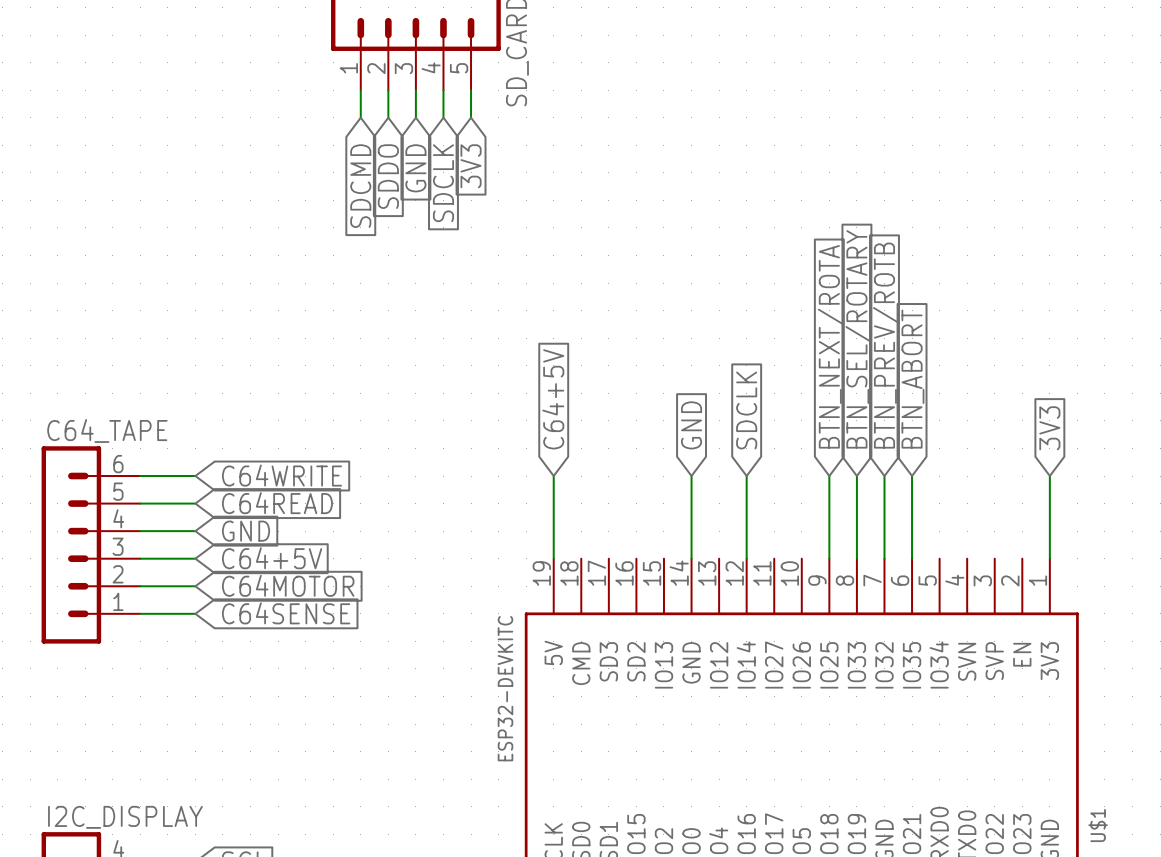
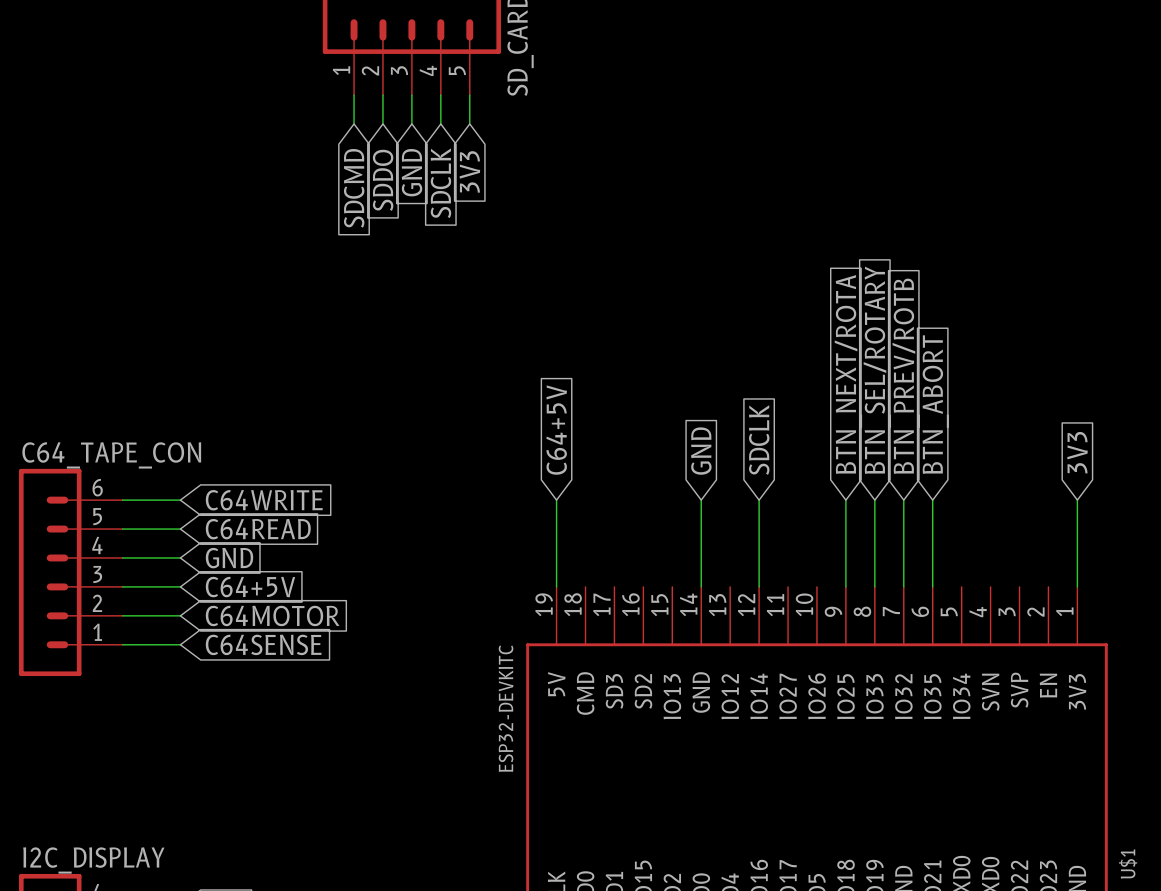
C64_TAPE name: C64_TAPE (107, 430) -> C64_TAPE_CON (111, 455)

